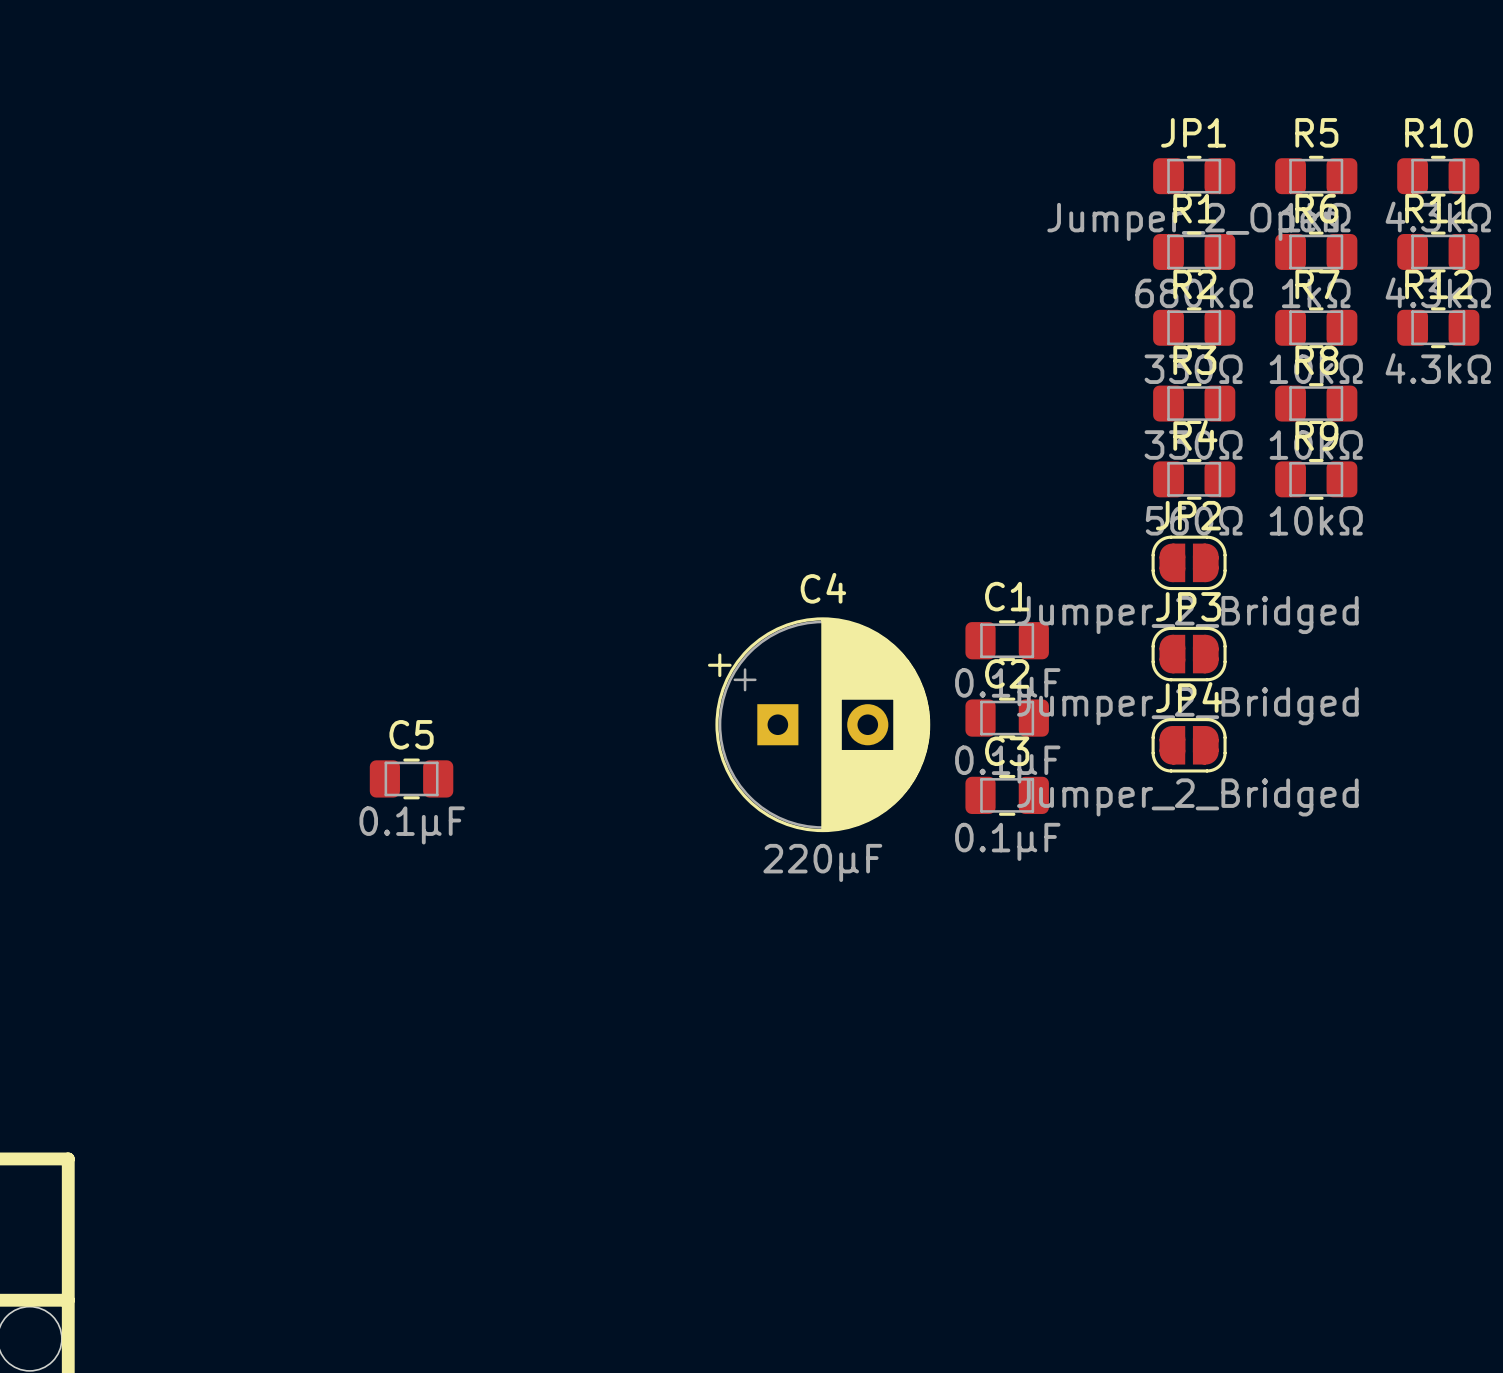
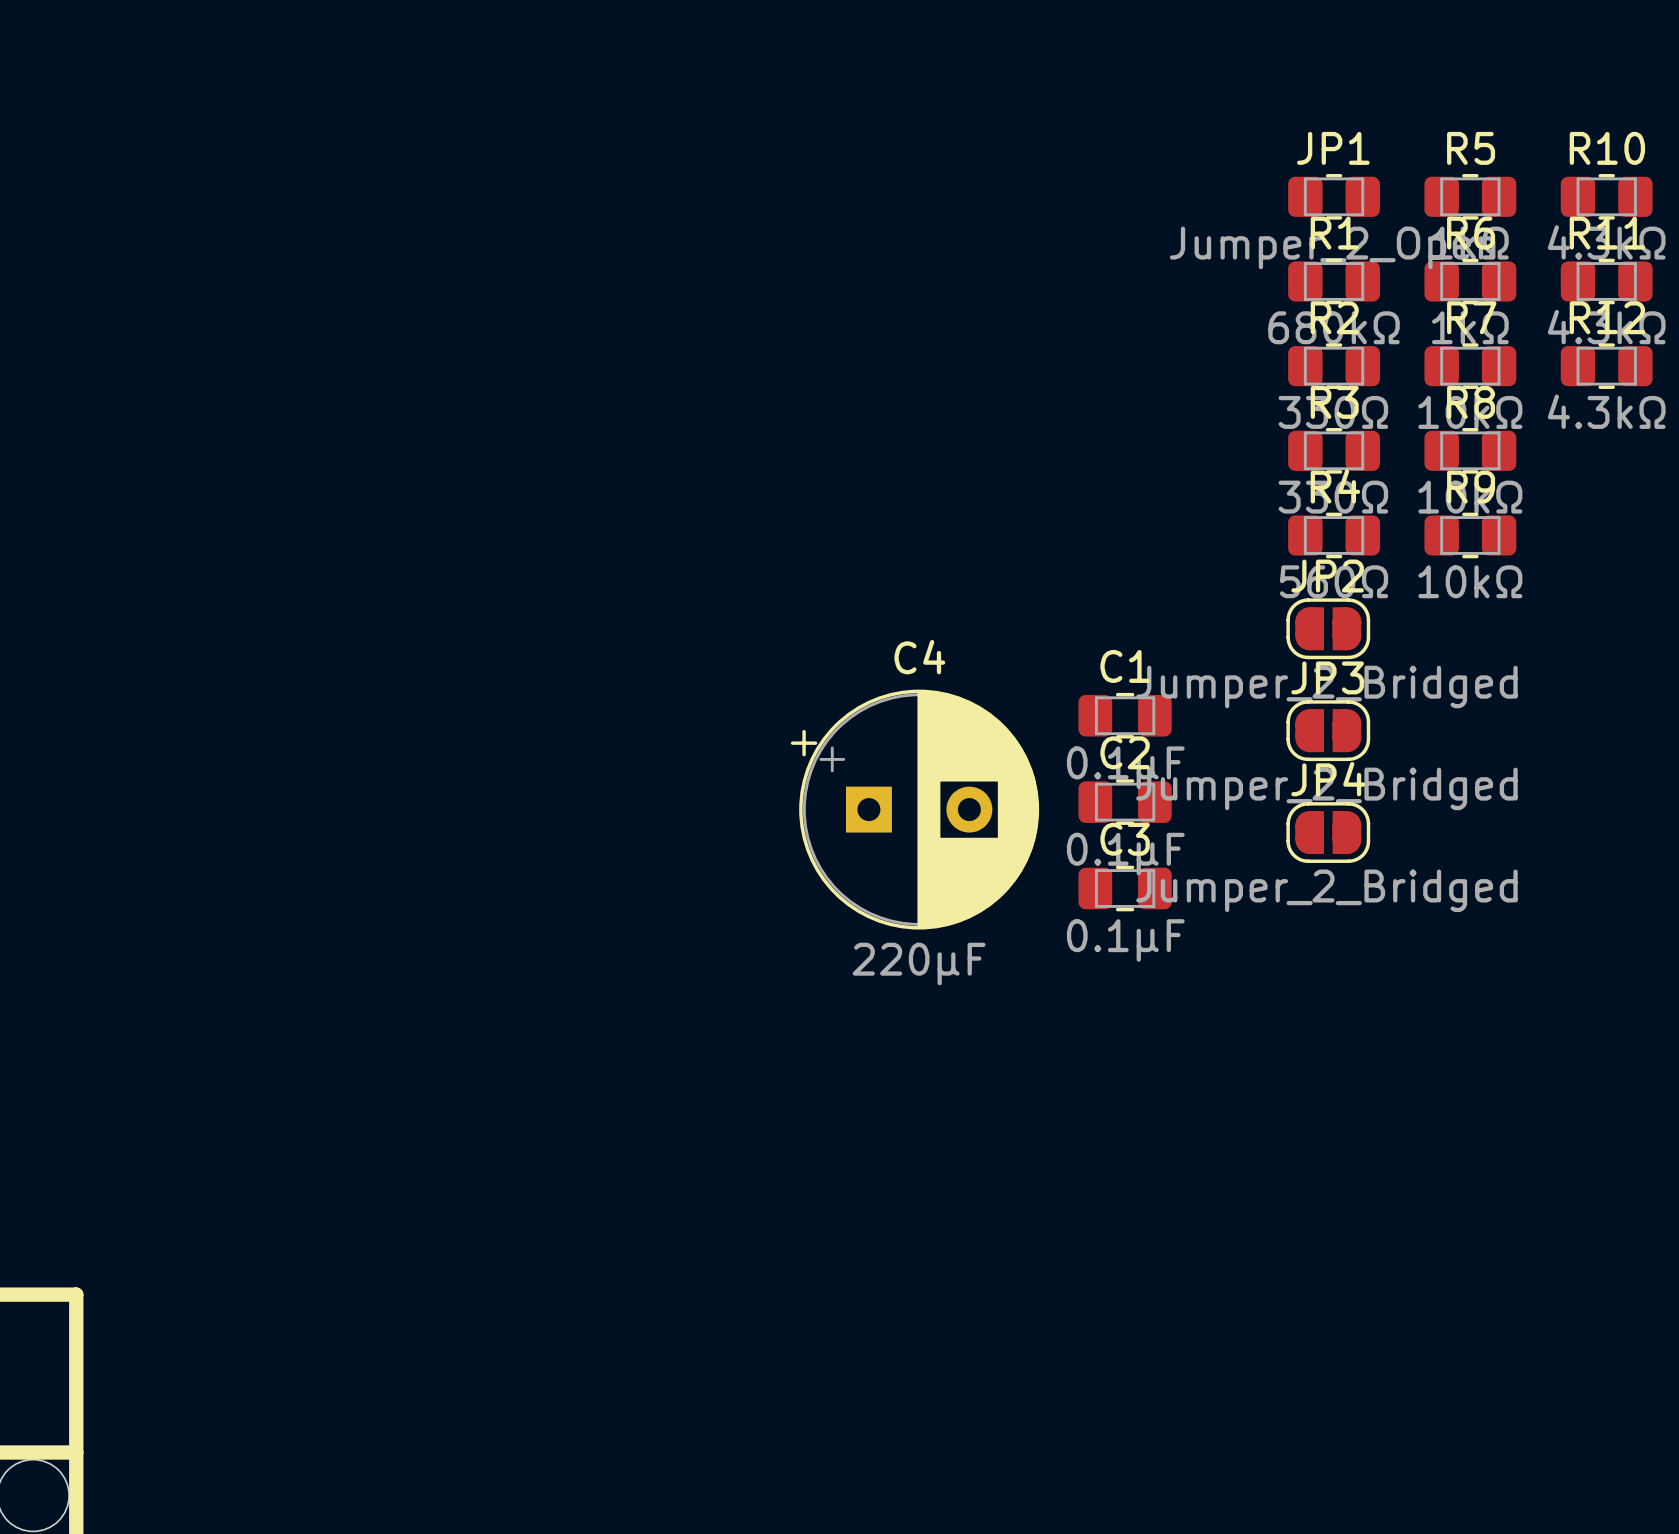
C5: 0.1µF (411, 778) -> none

